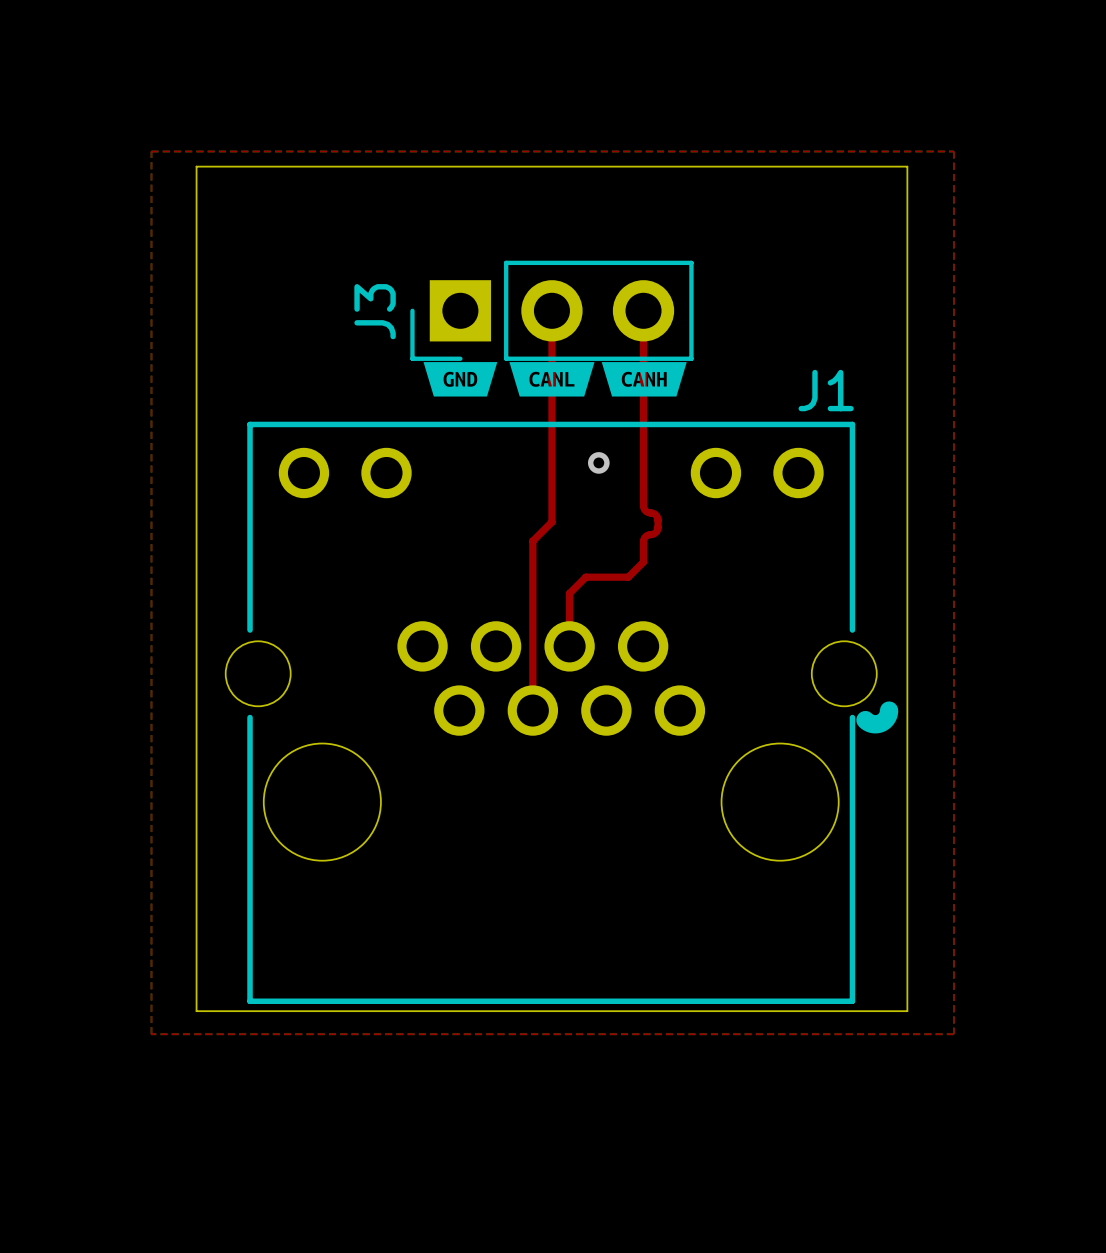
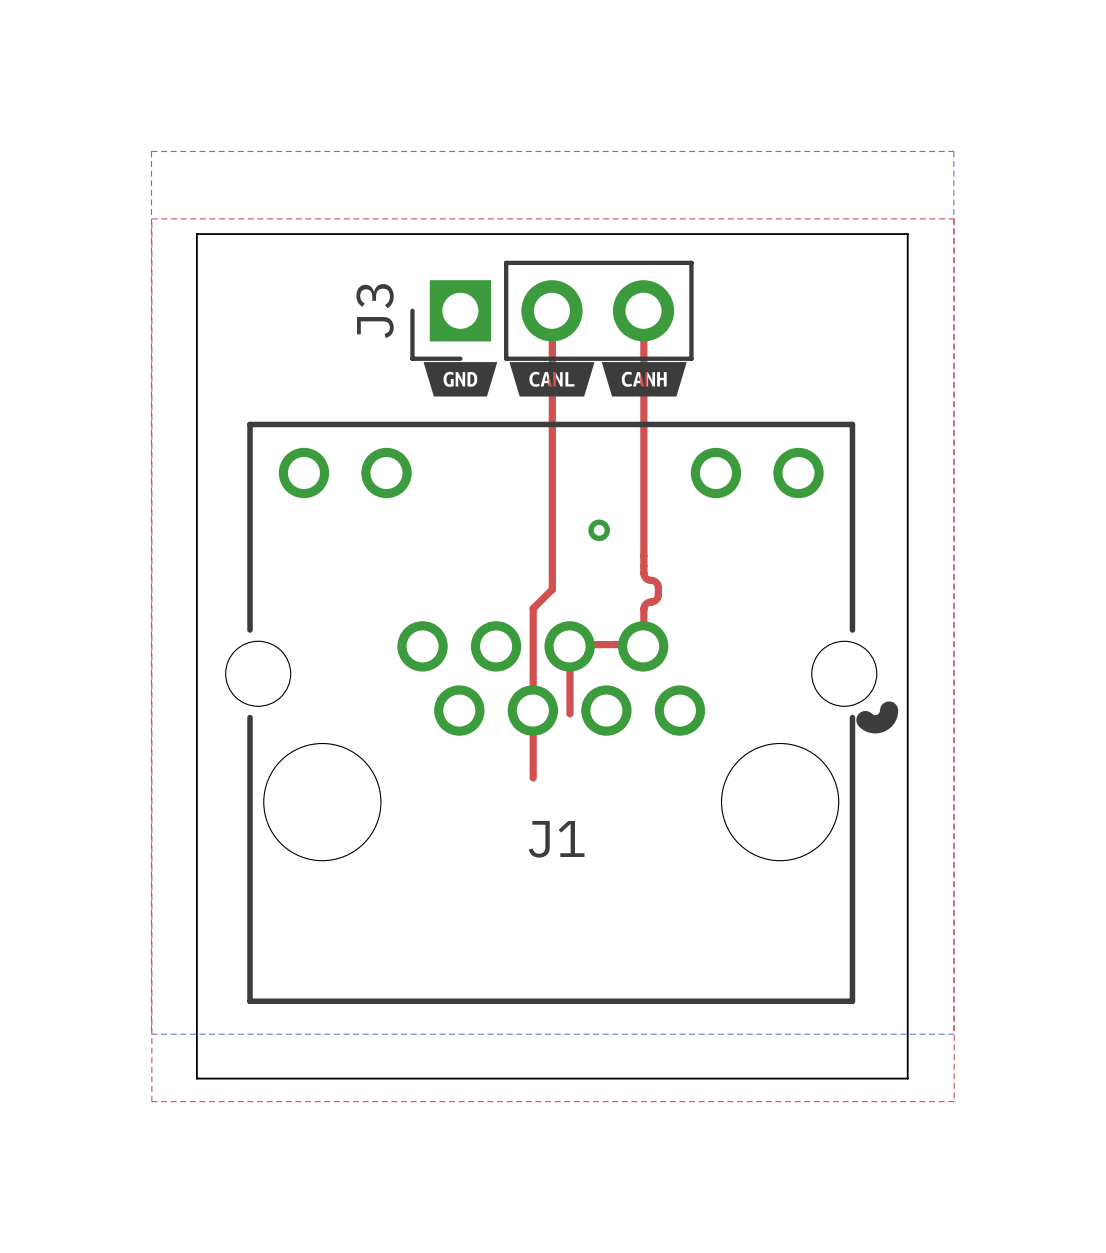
top zone outline: (151, 151) (953, 151) (953, 1034) (151, 1034) (151, 151) -> (151, 218) (954, 218) (954, 1101) (151, 1101) (151, 218)
board edge: (196, 166) (907, 166) (907, 1011) (196, 1011) (196, 166) -> (196, 234) (907, 234) (907, 1078) (196, 1078) (196, 234)
top track: none -> (552, 299) (552, 589) (533, 608) (533, 777)
top track: none -> (643, 299) (643, 573) (646, 578) (657, 584) (658, 595) (655, 600) (644, 605) (643, 629) (628, 644) (586, 644) (569, 660) (569, 713)
top track: (551, 310) (551, 522) (532, 541) (532, 710) -> none
top track: (643, 310) (643, 505) (646, 511) (657, 516) (657, 529) (655, 533) (644, 538) (643, 562) (628, 577) (585, 577) (569, 593) (569, 646) -> none
J1 name position: J1 (826, 390) -> J1 (556, 839)
via position: (598, 462) -> (599, 530)

